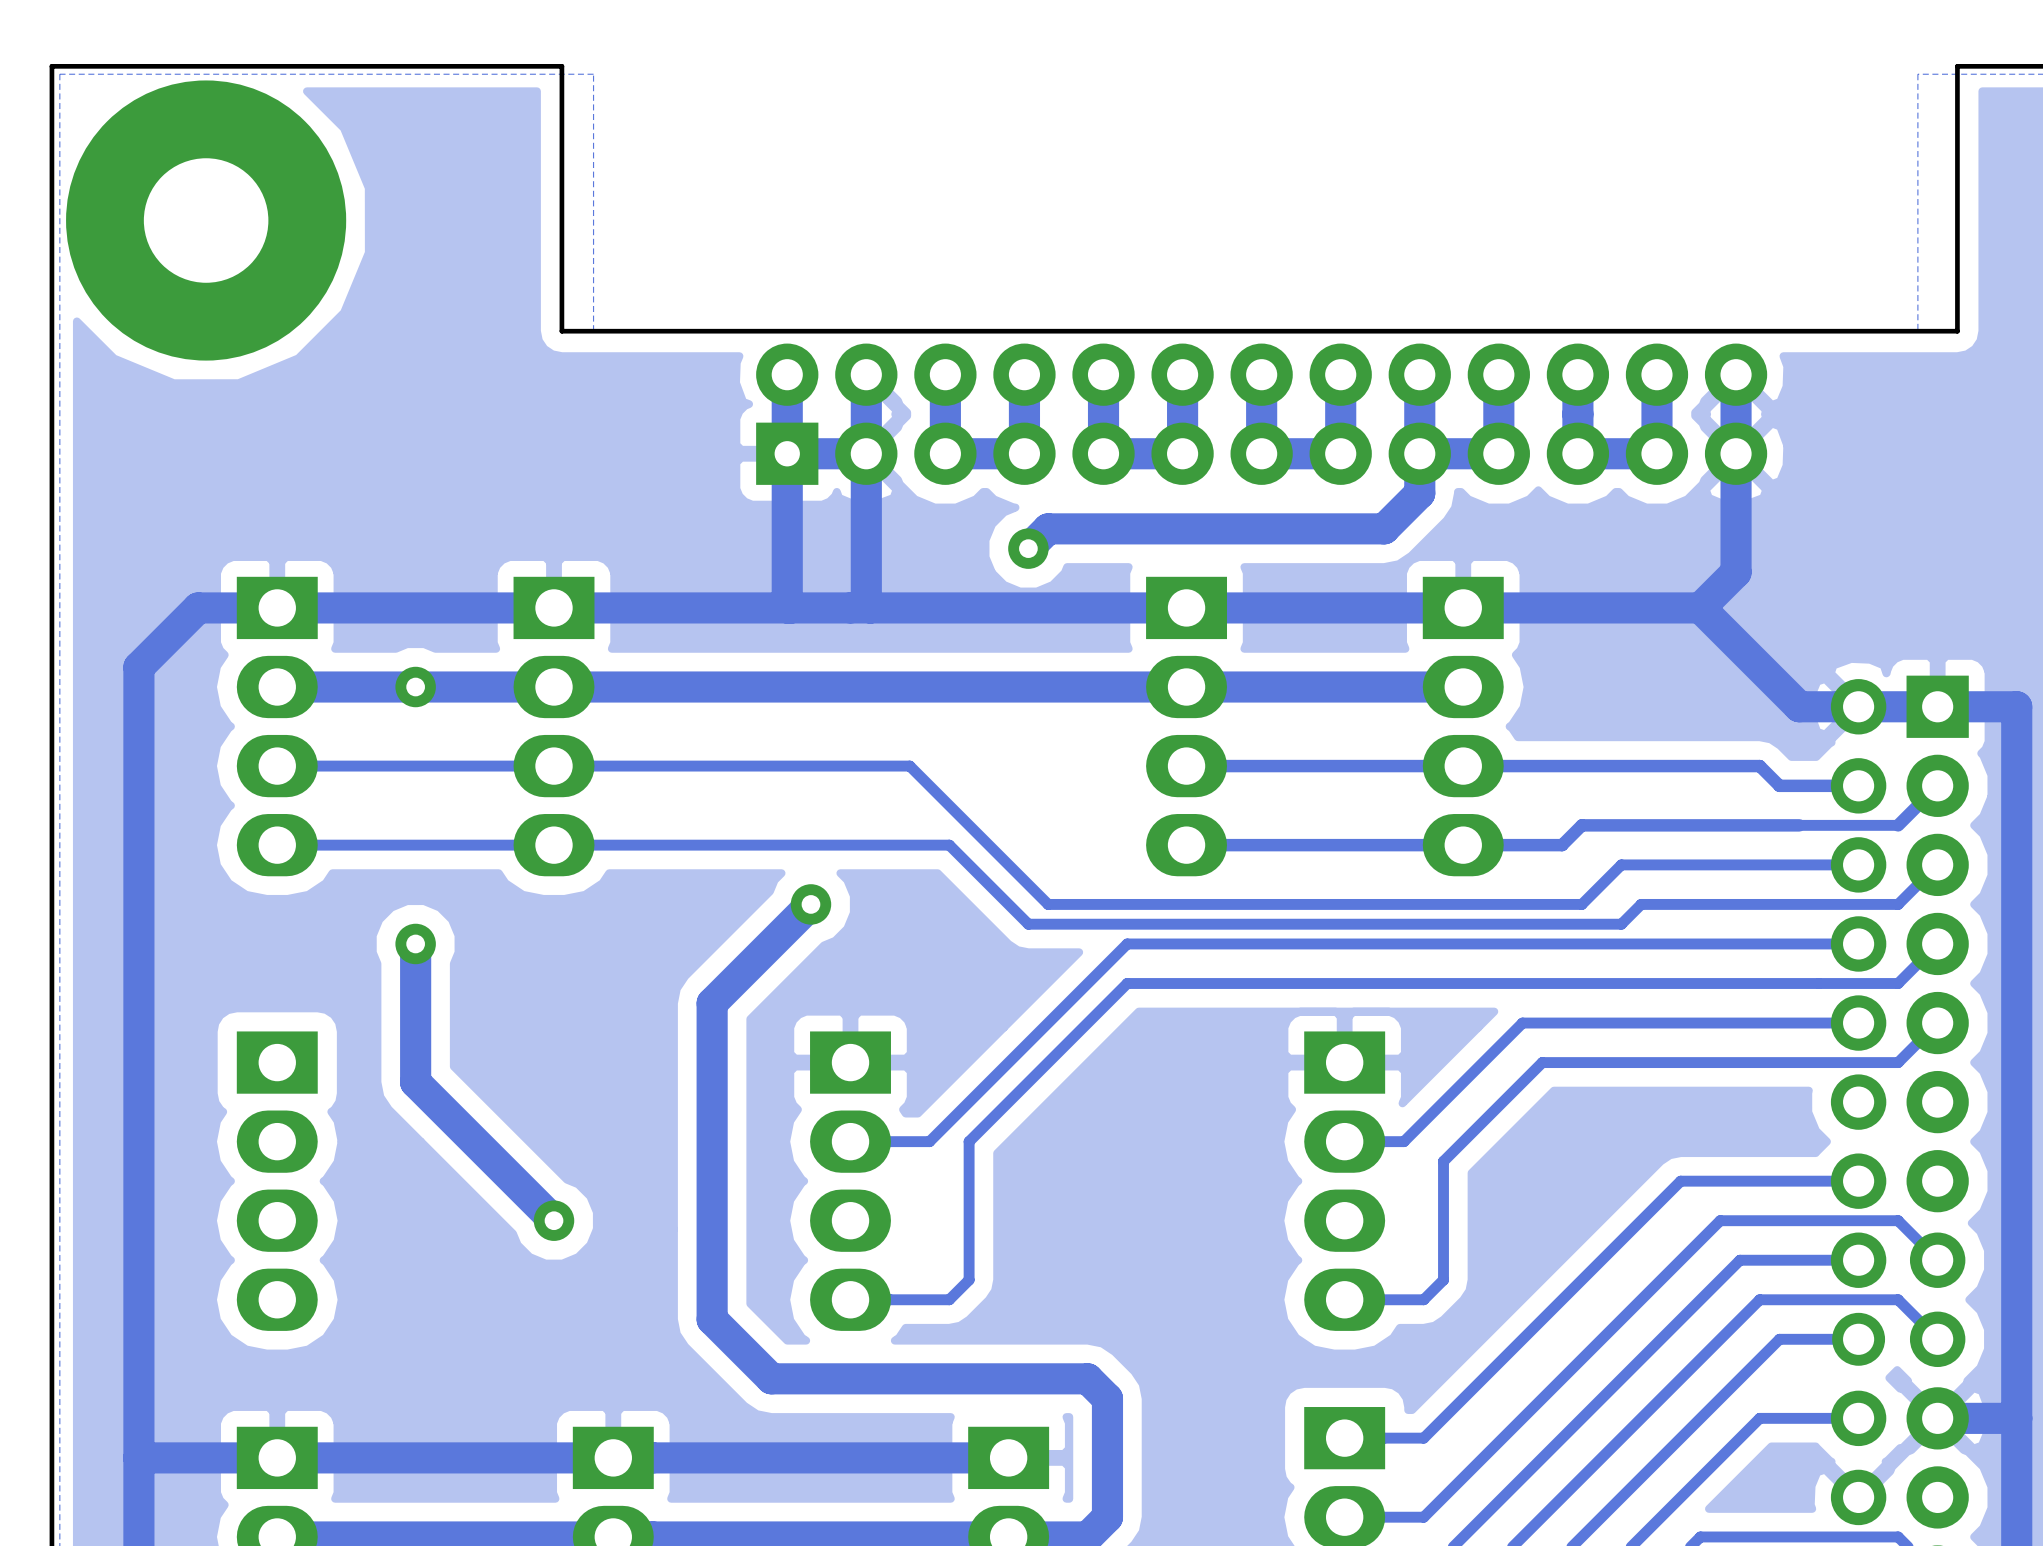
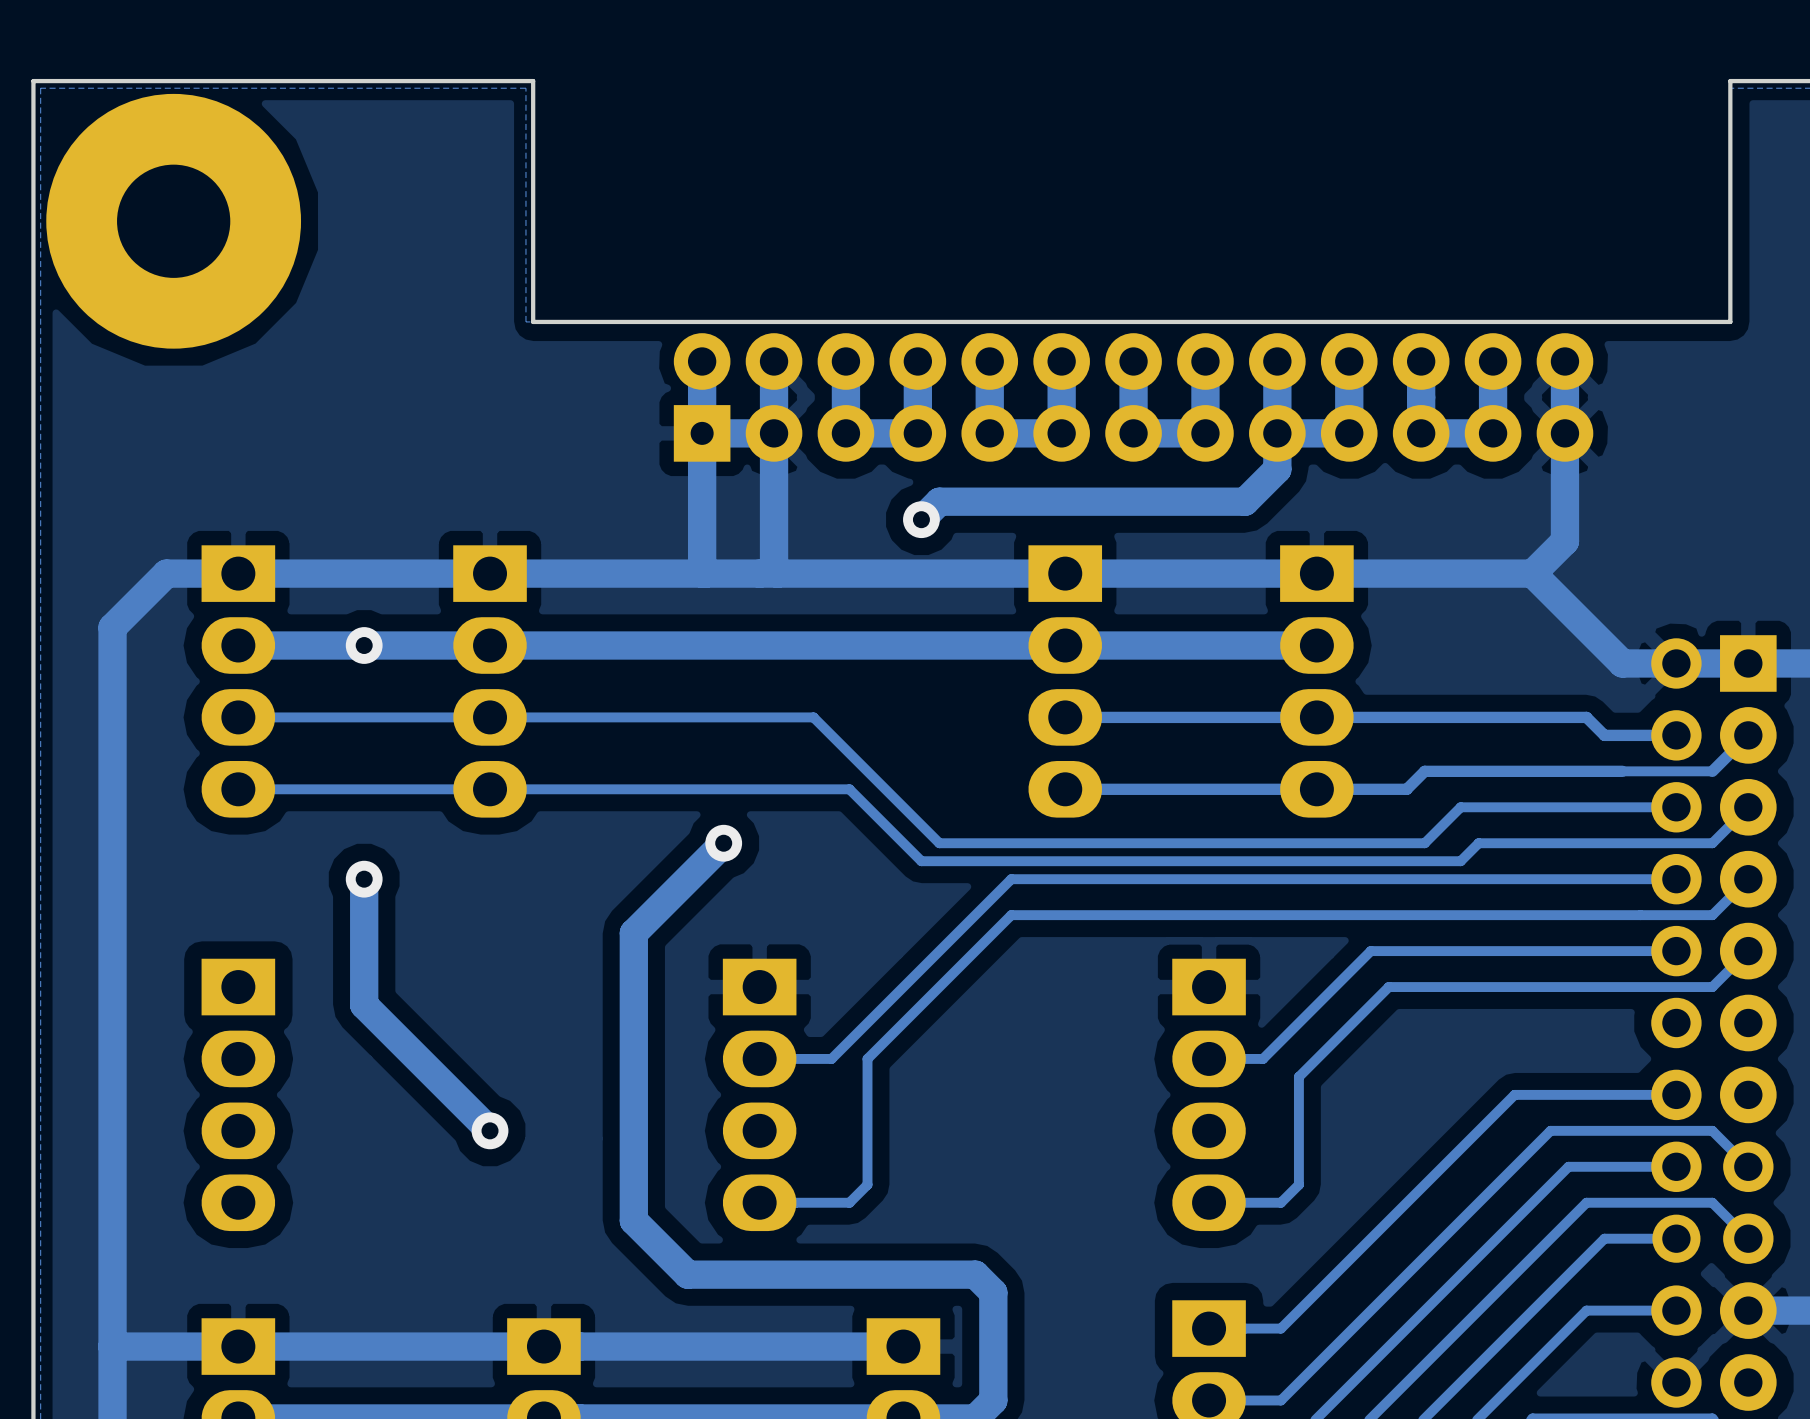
board edge: (561, 66) (561, 331) (601, 331) -> (497, 81) (533, 81) (533, 321)
board edge: (1957, 66) (1957, 331) (1917, 331) -> (1766, 81) (1730, 81) (1730, 321)

